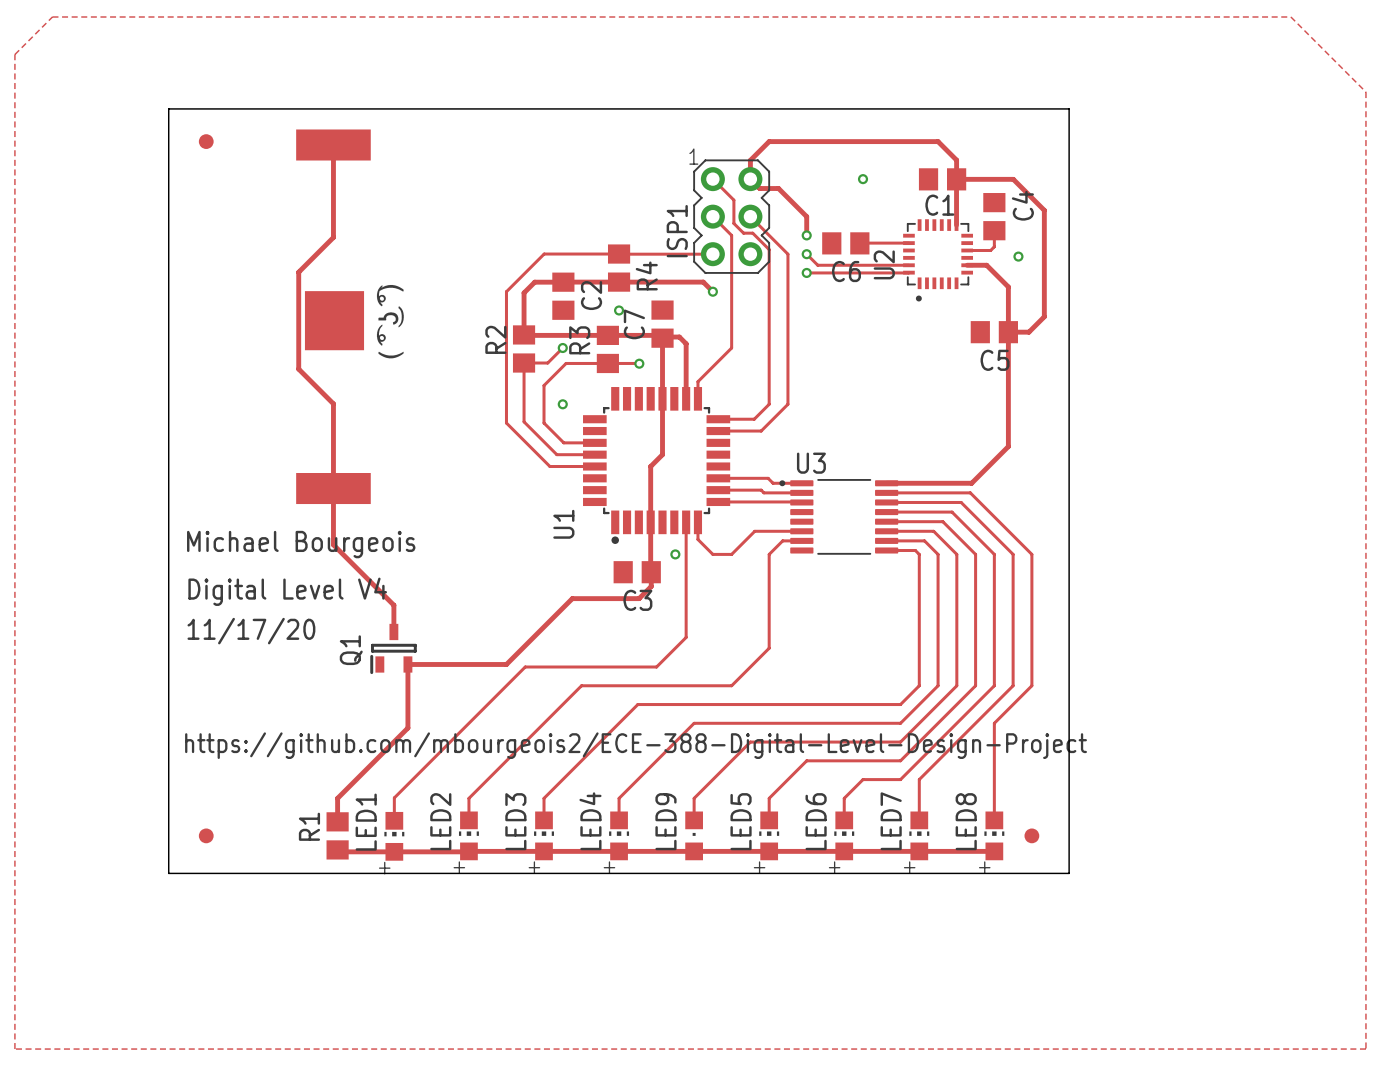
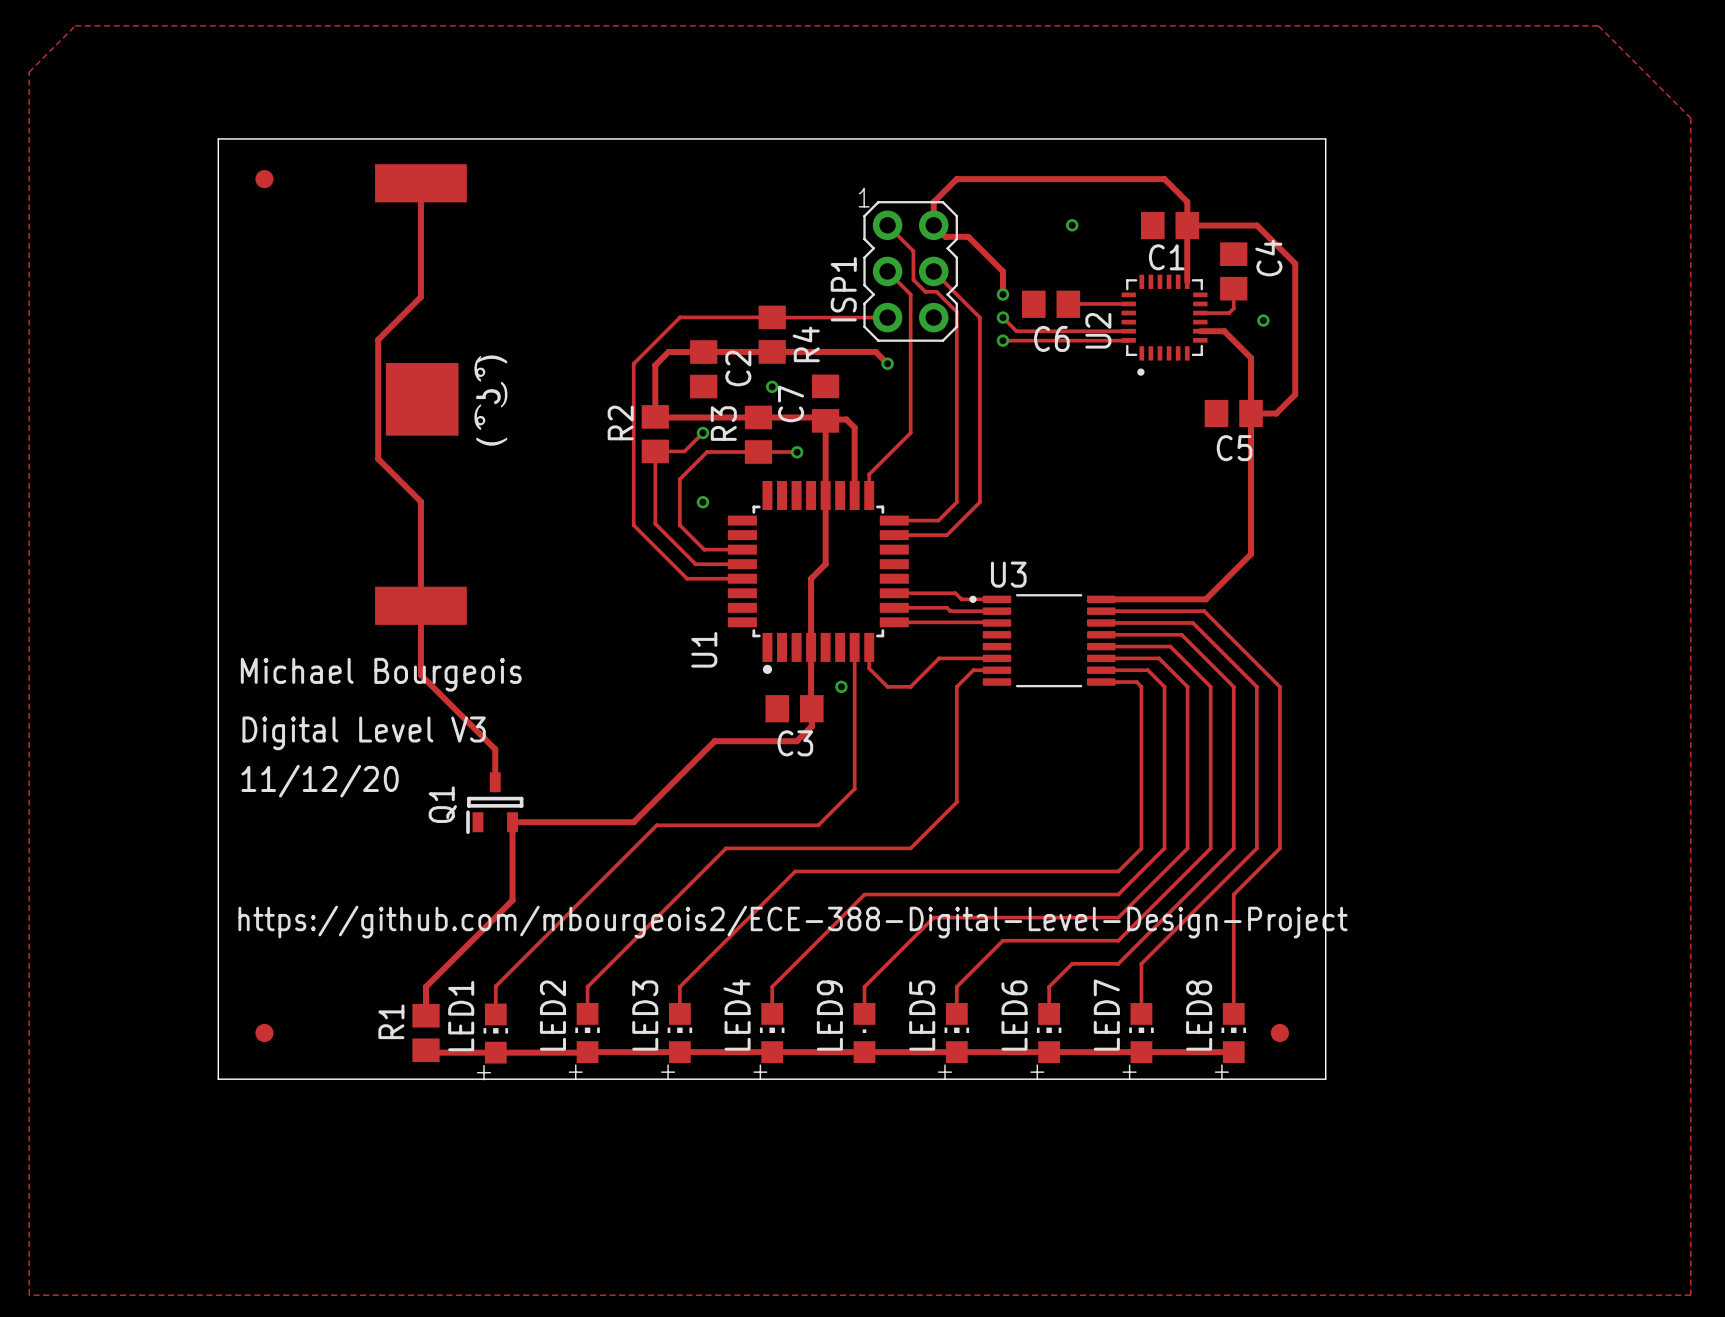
text: Digital Level V4 (287, 591) -> Digital Level V3 (364, 733)
text: 11/17/20 (251, 631) -> 11/12/20 (320, 781)

